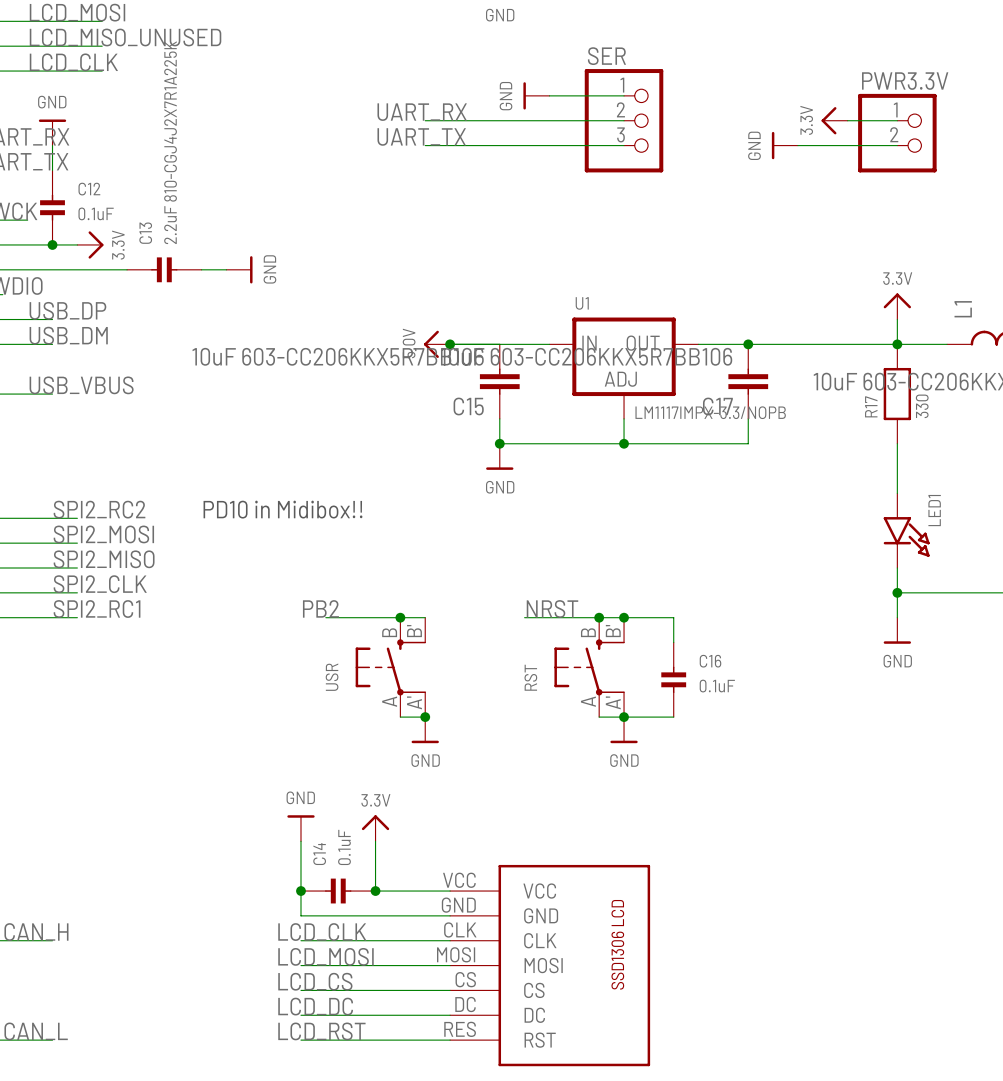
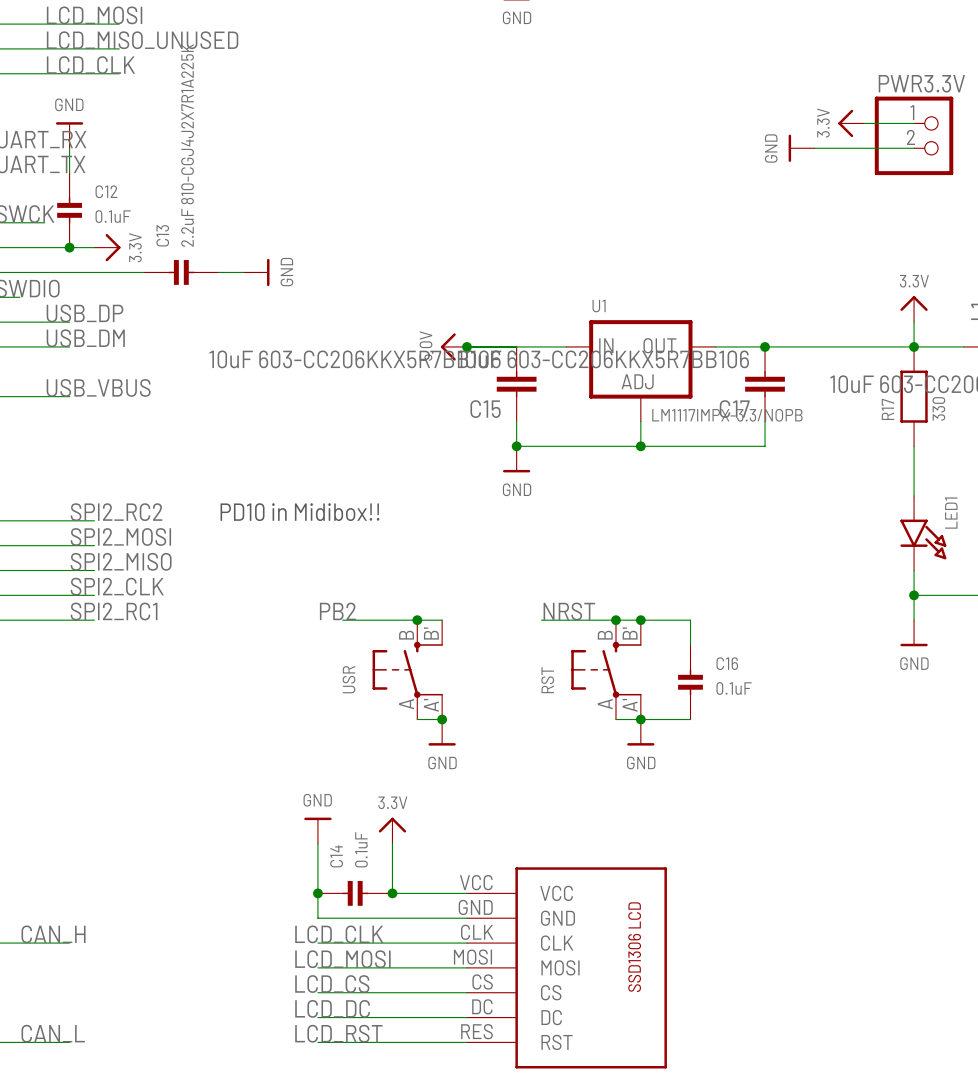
power symbol: GND (536, 95) -> none
wire: (549, 95) (624, 95) -> none
label: UART_RX (422, 112) -> none
wire: (425, 120) (624, 120) -> none
SER: (624, 120) -> none
label: UART_TX (421, 136) -> none
wire: (425, 145) (624, 145) -> none

